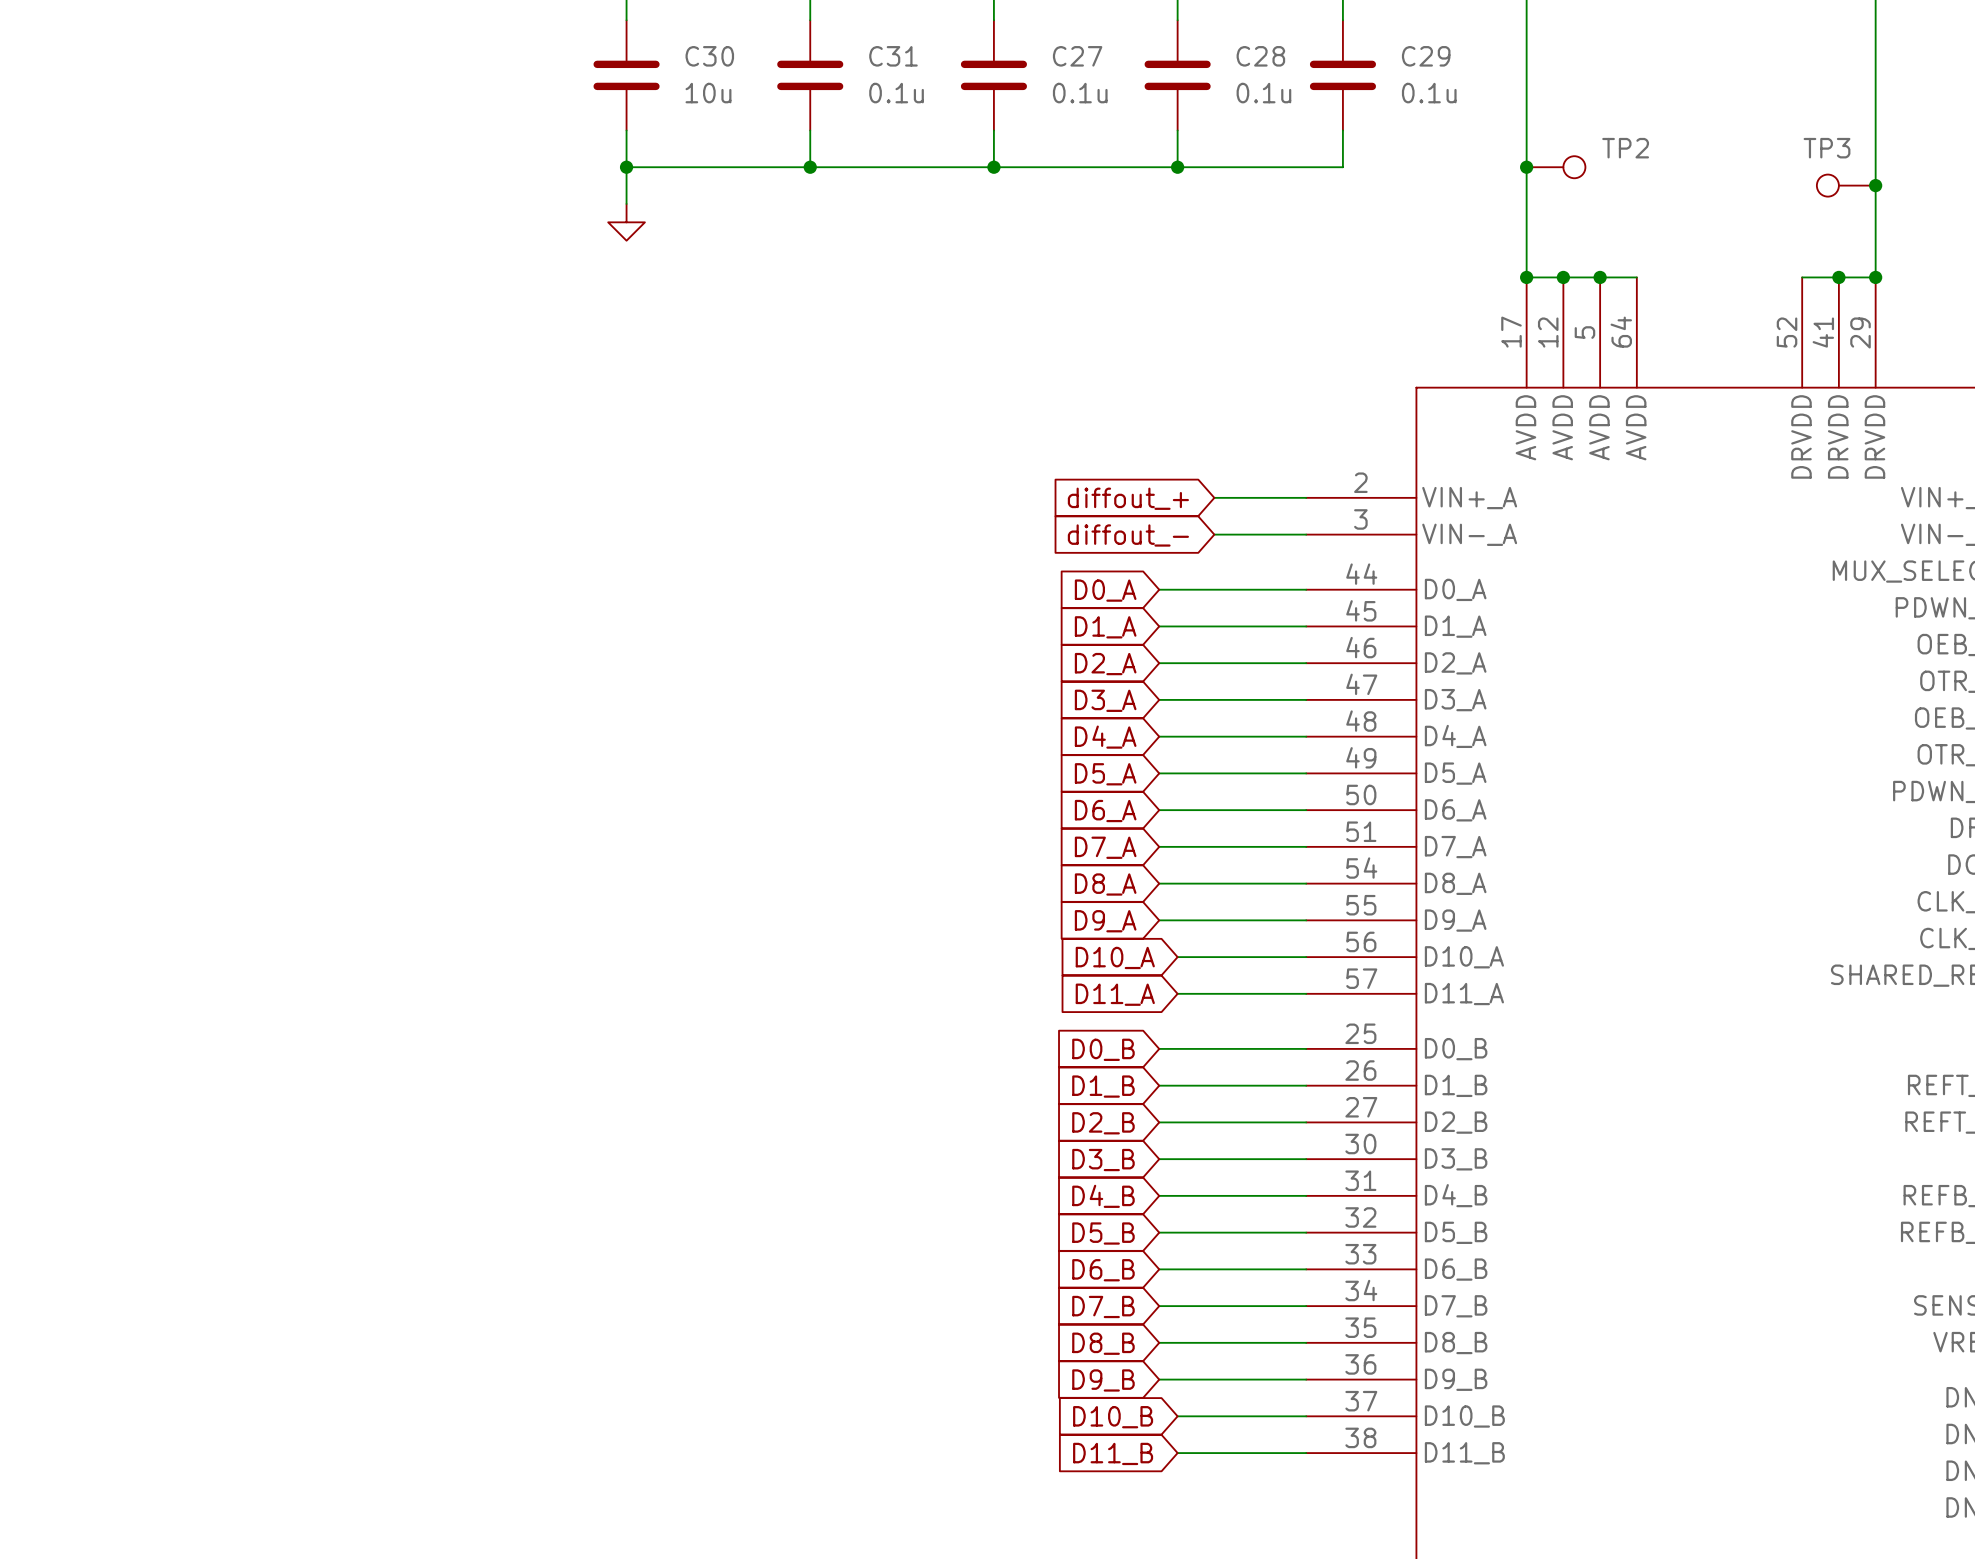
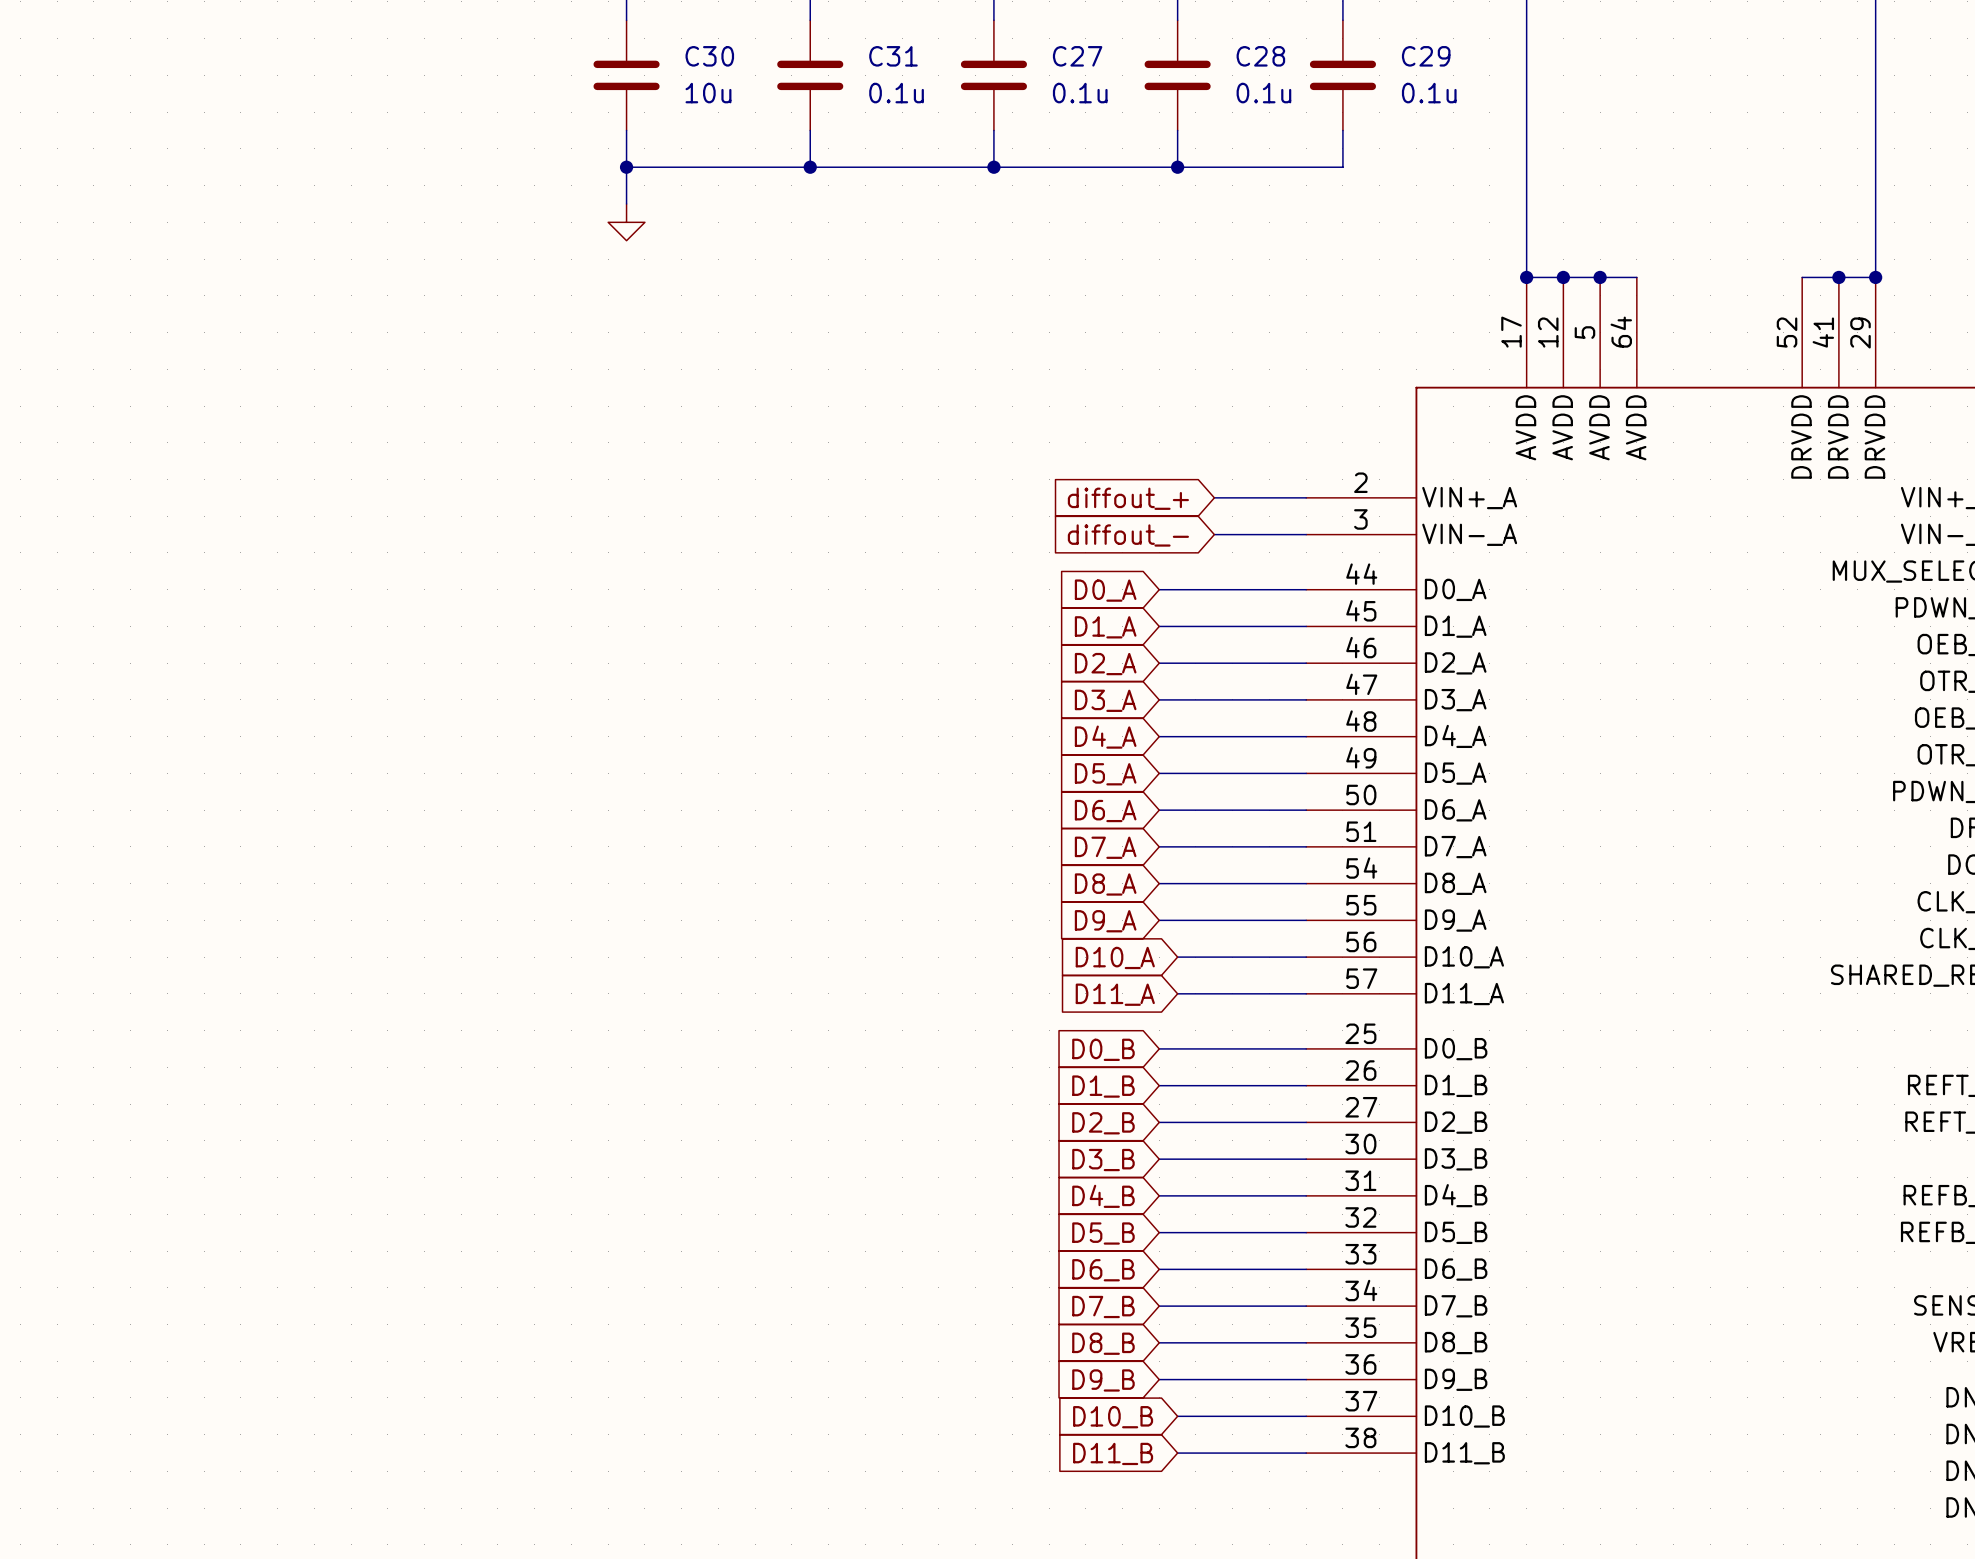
junction: (1526, 167) -> none
TP2: (1556, 167) -> none
TP3: (1846, 185) -> none
junction: (1875, 185) -> none

